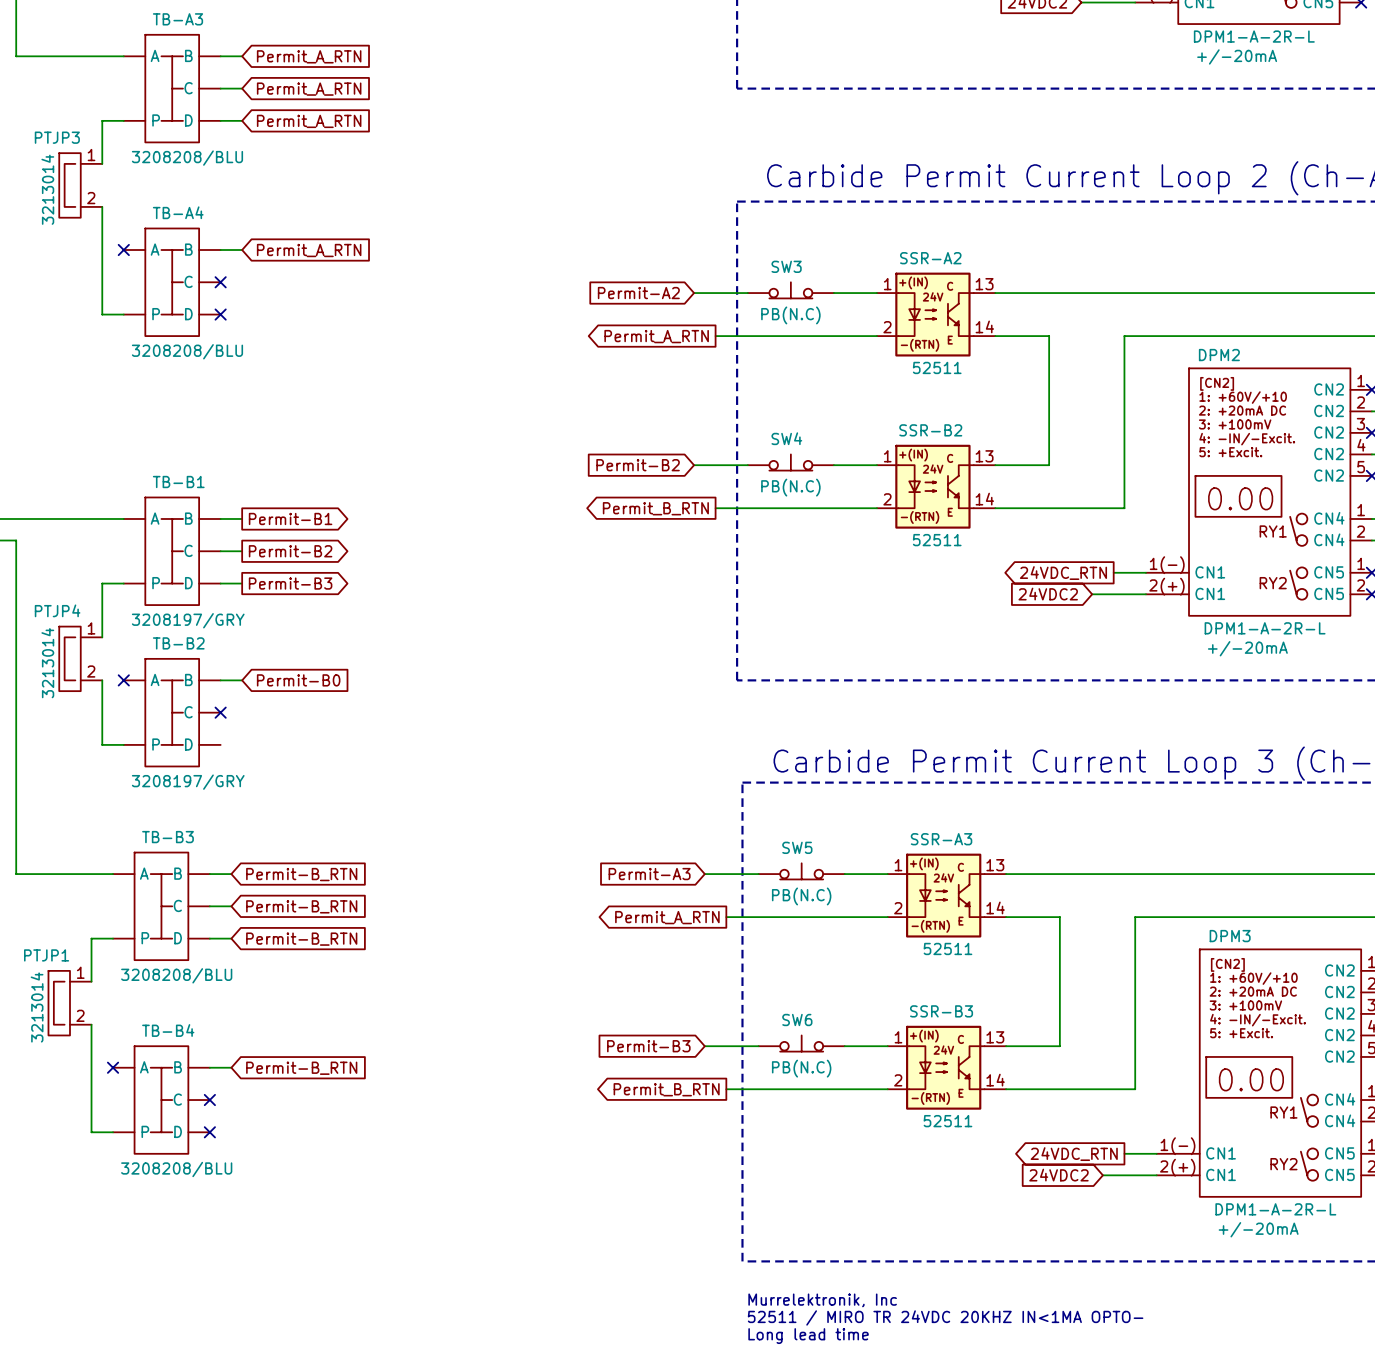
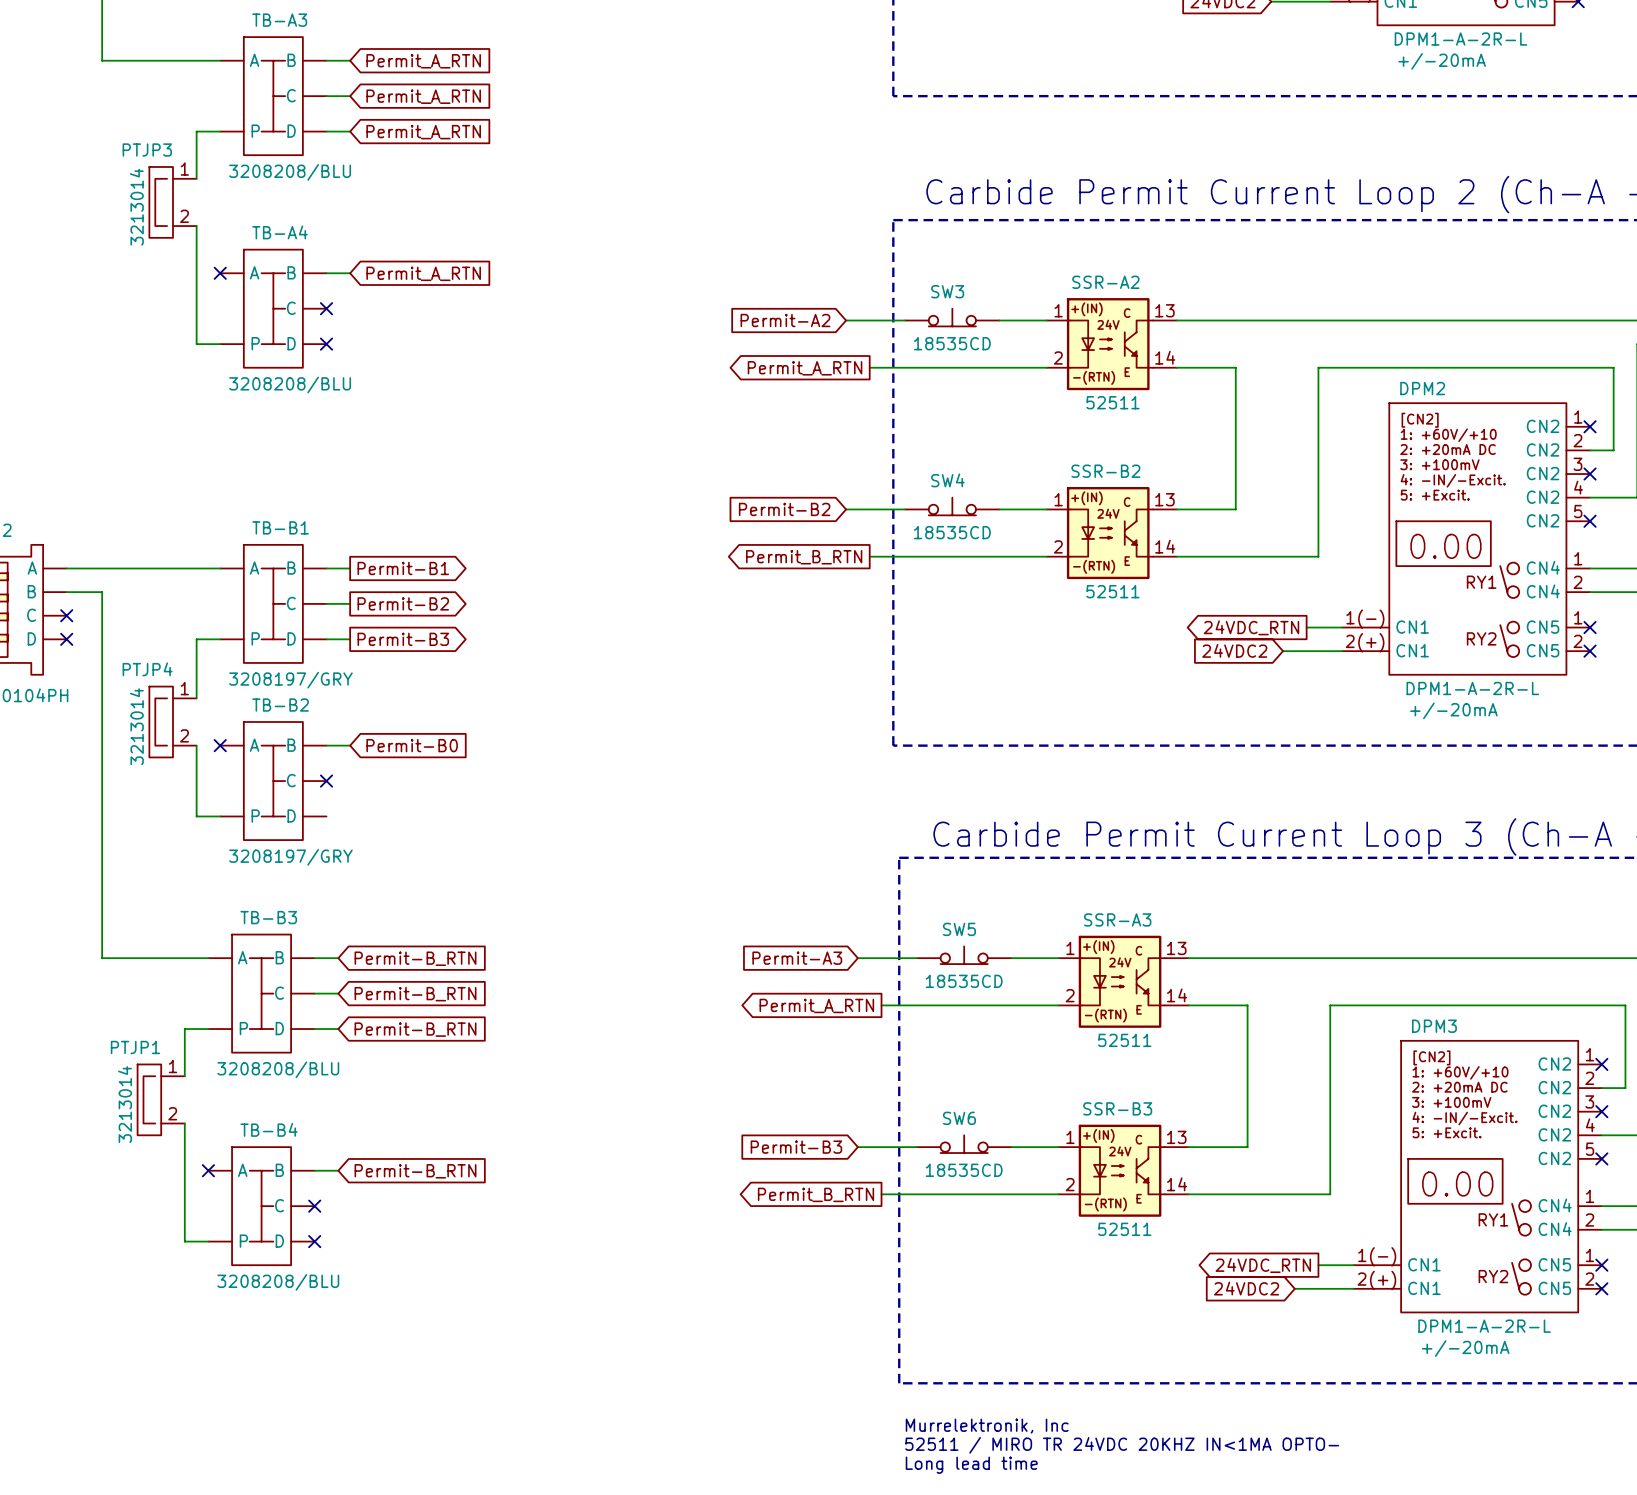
SW3 value: PB(N.C) (790, 315) -> 18535CD (952, 343)
SW4 value: PB(N.C) (790, 487) -> 18535CD (952, 532)
SW5 value: PB(N.C) (801, 896) -> 18535CD (964, 981)
SW6 value: PB(N.C) (801, 1068) -> 18535CD (964, 1170)

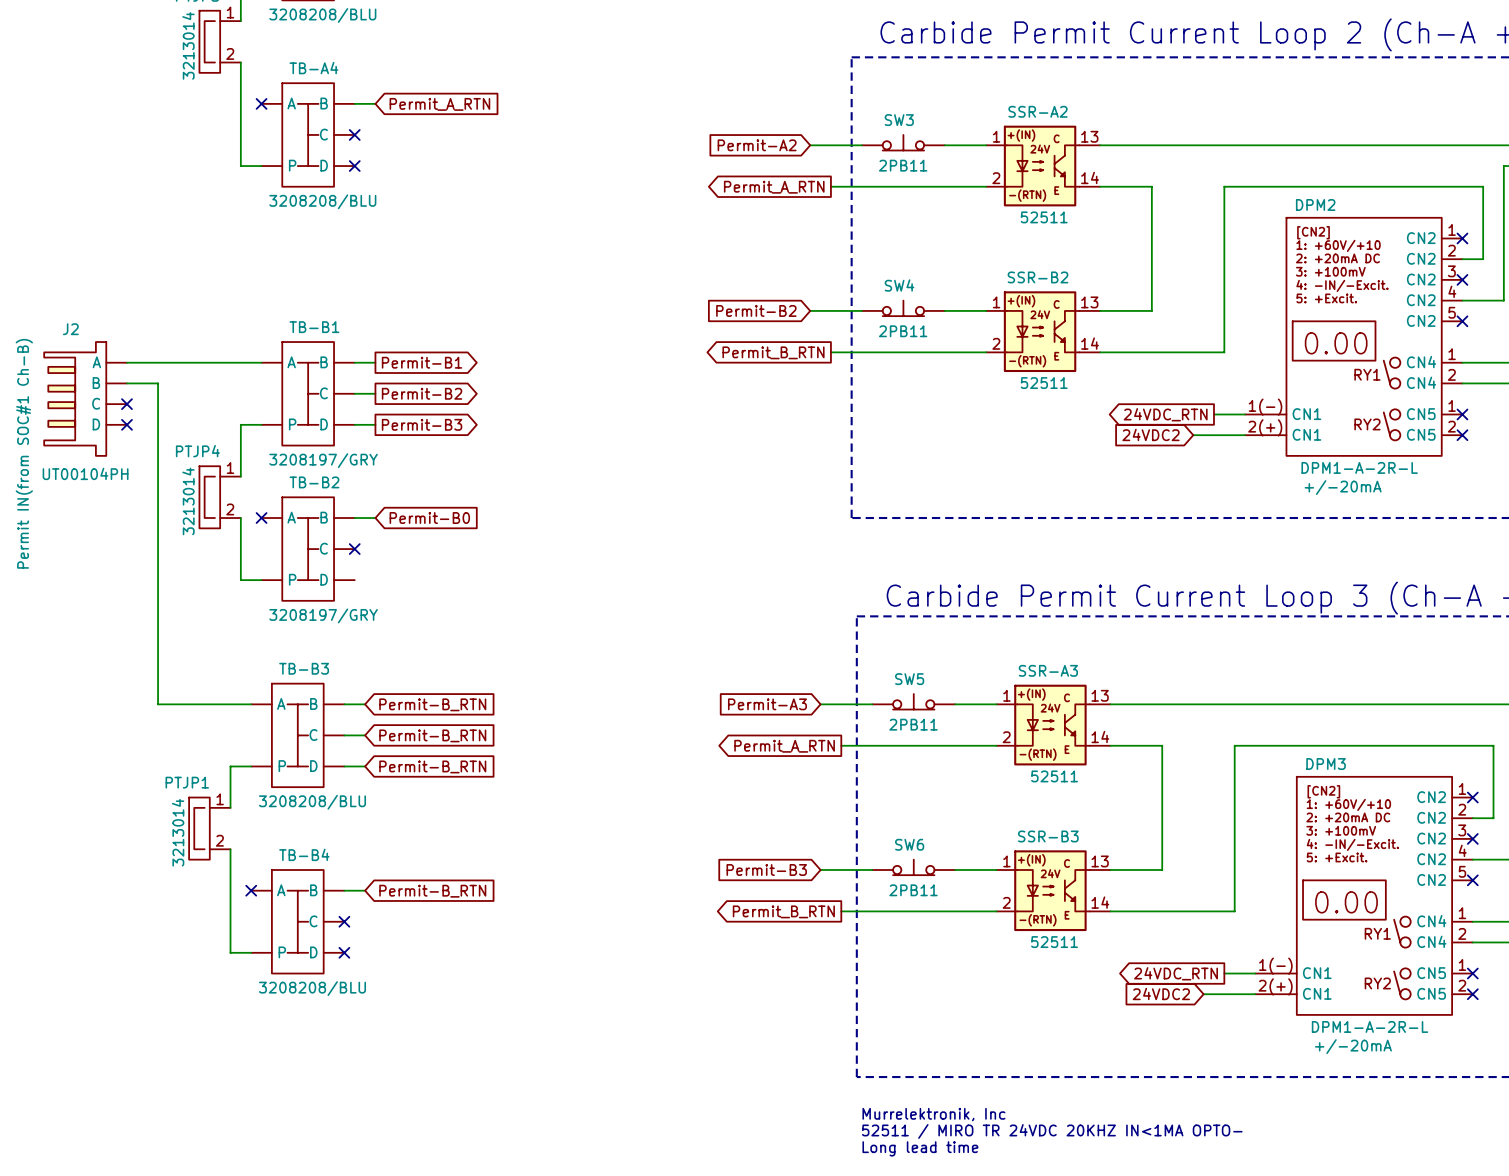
SW3 value: 18535CD (952, 343) -> 2PB11 (903, 165)
SW4 value: 18535CD (952, 532) -> 2PB11 (903, 331)
SW5 value: 18535CD (964, 981) -> 2PB11 (913, 724)
SW6 value: 18535CD (964, 1170) -> 2PB11 (913, 890)

